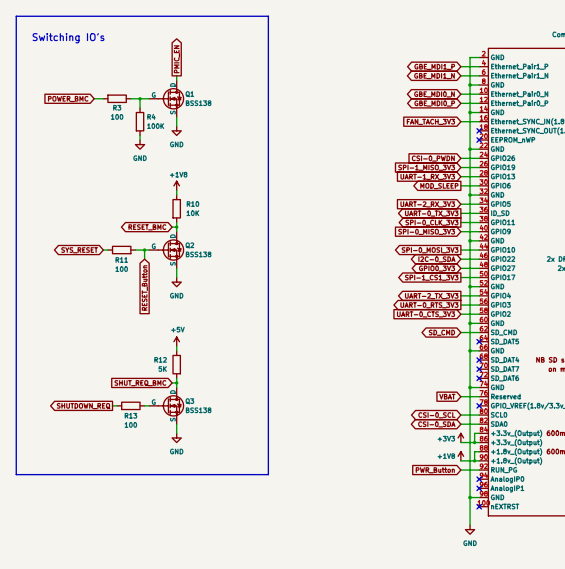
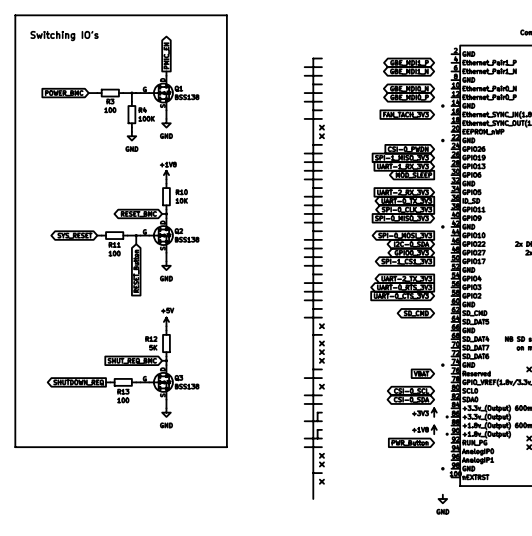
line: (240, 16) (268, 16) (268, 474) (240, 474) -> (226, 15) (226, 447)
wire: (479, 57) (470, 57) (470, 525) -> none
wire: none -> (321, 58) (313, 58) (313, 498)
wire: (460, 66) (479, 66) -> none
wire: none -> (304, 67) (321, 67)
wire: (460, 75) (479, 75) -> none
wire: none -> (304, 75) (321, 75)
wire: (470, 85) (479, 85) -> none
junction: (470, 85) -> none
wire: none -> (313, 84) (321, 84)
wire: (460, 94) (479, 94) -> none
wire: none -> (304, 93) (321, 93)
wire: (460, 103) (479, 103) -> none
wire: none -> (304, 101) (321, 101)
wire: (470, 112) (479, 112) -> none
wire: none -> (313, 110) (321, 110)
wire: (460, 121) (479, 121) -> none
wire: none -> (304, 118) (321, 118)
no-connect mark: (479, 130) -> none
no-connect mark: none -> (321, 127)
no-connect mark: (479, 140) -> none
no-connect mark: none -> (321, 136)
wire: (470, 149) (479, 149) -> none
wire: none -> (313, 144) (321, 144)
wire: (460, 158) (479, 158) -> none
wire: none -> (304, 153) (321, 153)
wire: (460, 167) (479, 167) -> none
wire: none -> (304, 162) (321, 162)
wire: (460, 176) (479, 176) -> none
wire: none -> (304, 170) (321, 170)
wire: (460, 185) (479, 185) -> none
wire: none -> (304, 179) (321, 179)
wire: (470, 195) (479, 195) -> none
junction: (470, 195) -> none
wire: none -> (313, 188) (321, 188)
wire: (460, 204) (479, 204) -> none
wire: none -> (304, 196) (321, 196)
wire: (460, 213) (479, 213) -> none
wire: none -> (304, 205) (321, 205)
wire: (460, 222) (479, 222) -> none
wire: none -> (304, 213) (321, 213)
wire: (460, 231) (479, 231) -> none
wire: none -> (304, 222) (321, 222)
wire: (470, 240) (479, 240) -> none
wire: none -> (313, 231) (321, 231)
wire: (460, 250) (479, 250) -> none
wire: none -> (304, 239) (321, 239)
wire: (460, 259) (479, 259) -> none
wire: none -> (304, 248) (321, 248)
wire: (460, 268) (479, 268) -> none
wire: none -> (304, 257) (321, 257)
wire: (460, 277) (479, 277) -> none
wire: none -> (304, 265) (321, 265)
wire: (470, 286) (479, 286) -> none
junction: (470, 286) -> none
wire: none -> (313, 274) (321, 274)
wire: (460, 295) (479, 295) -> none
wire: none -> (304, 283) (321, 283)
wire: (460, 305) (479, 305) -> none
wire: none -> (304, 291) (321, 291)
wire: (460, 314) (479, 314) -> none
wire: none -> (304, 300) (321, 300)
wire: (470, 323) (479, 323) -> none
junction: (470, 323) -> none
wire: none -> (313, 308) (321, 308)
wire: (460, 332) (479, 332) -> none
wire: none -> (304, 317) (321, 317)
no-connect mark: (479, 341) -> none
no-connect mark: none -> (321, 326)
wire: (470, 350) (479, 350) -> none
junction: (470, 350) -> none
wire: none -> (313, 334) (321, 334)
no-connect mark: (479, 360) -> none
no-connect mark: none -> (321, 343)
no-connect mark: (479, 369) -> none
no-connect mark: none -> (321, 352)
no-connect mark: (479, 378) -> none
no-connect mark: none -> (321, 360)
wire: (470, 387) (479, 387) -> none
wire: none -> (313, 369) (321, 369)
no-connect mark: none -> (529, 369)
wire: (460, 396) (479, 396) -> none
wire: none -> (304, 378) (321, 378)
no-connect mark: (479, 405) -> none
no-connect mark: none -> (321, 386)
wire: (460, 415) (479, 415) -> none
wire: none -> (304, 395) (321, 395)
wire: (460, 424) (479, 424) -> none
wire: none -> (304, 403) (321, 403)
wire: (479, 433) (474, 433) (474, 442) -> none
wire: none -> (321, 412) (317, 412) (317, 421)
wire: (460, 442) (479, 442) -> none
wire: none -> (304, 421) (321, 421)
wire: (479, 451) (474, 451) (474, 460) -> none
wire: none -> (321, 429) (317, 429) (317, 438)
wire: (460, 460) (479, 460) -> none
wire: none -> (304, 438) (321, 438)
no-connect mark: none -> (529, 438)
wire: (460, 470) (479, 470) -> none
wire: none -> (304, 447) (321, 447)
no-connect mark: none -> (529, 447)
no-connect mark: (479, 479) -> none
no-connect mark: none -> (321, 455)
no-connect mark: (479, 488) -> none
no-connect mark: none -> (321, 464)
wire: (470, 497) (479, 497) -> none
wire: none -> (313, 473) (321, 473)
no-connect mark: (479, 506) -> none
no-connect mark: none -> (321, 481)

